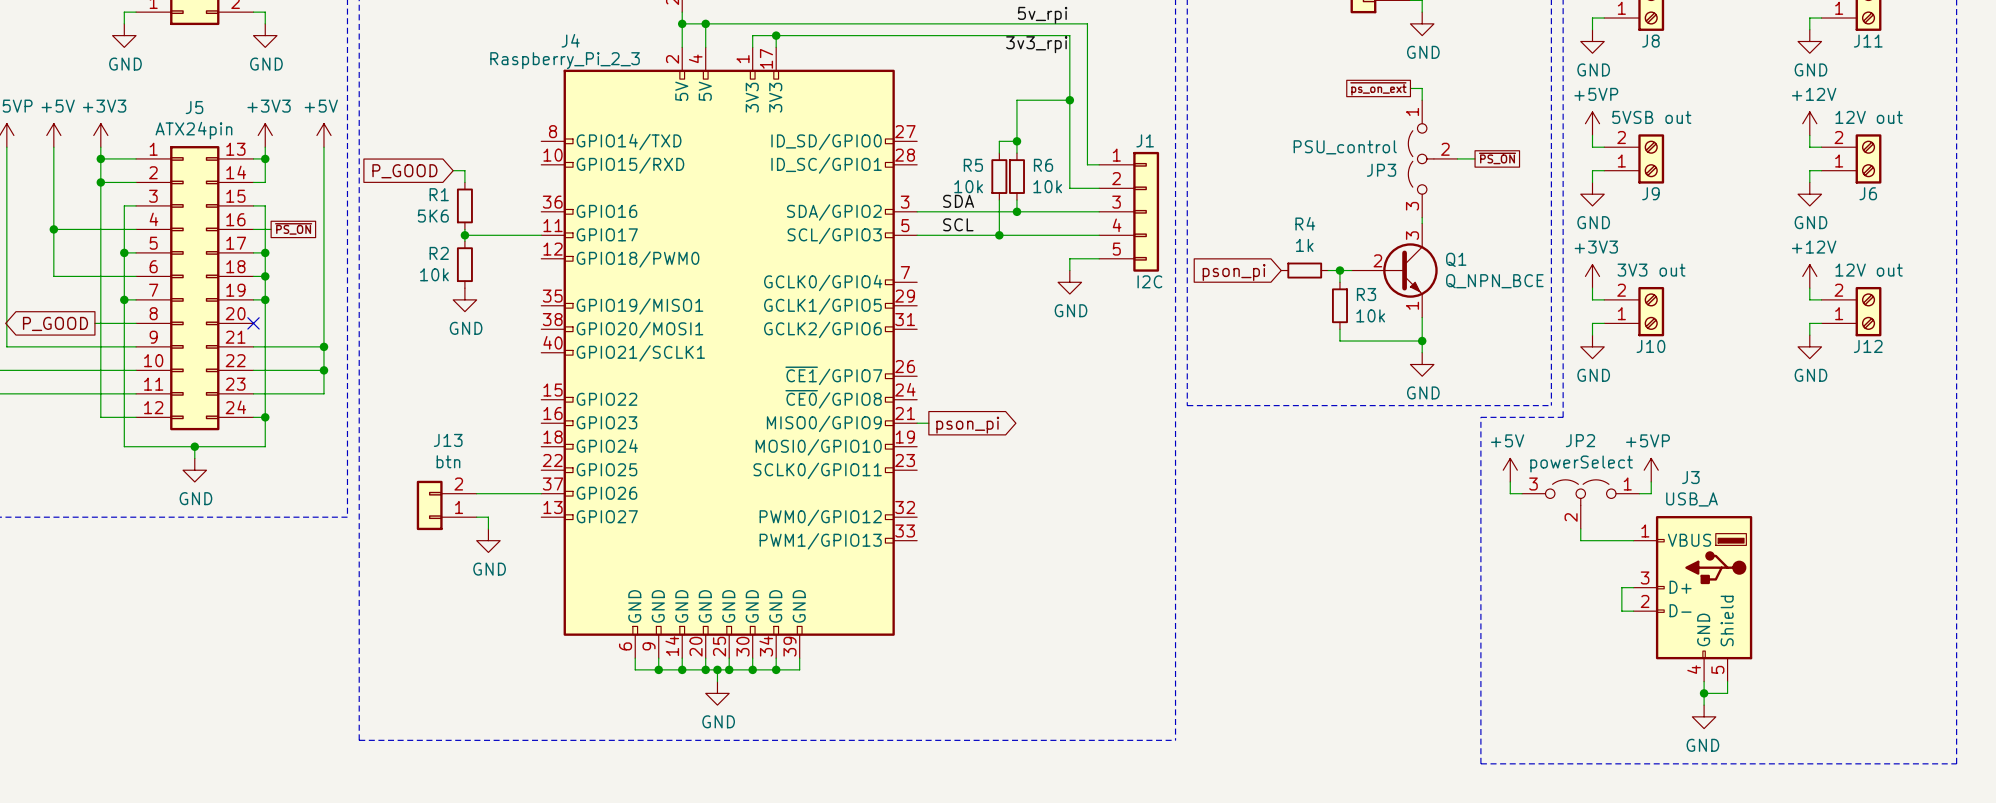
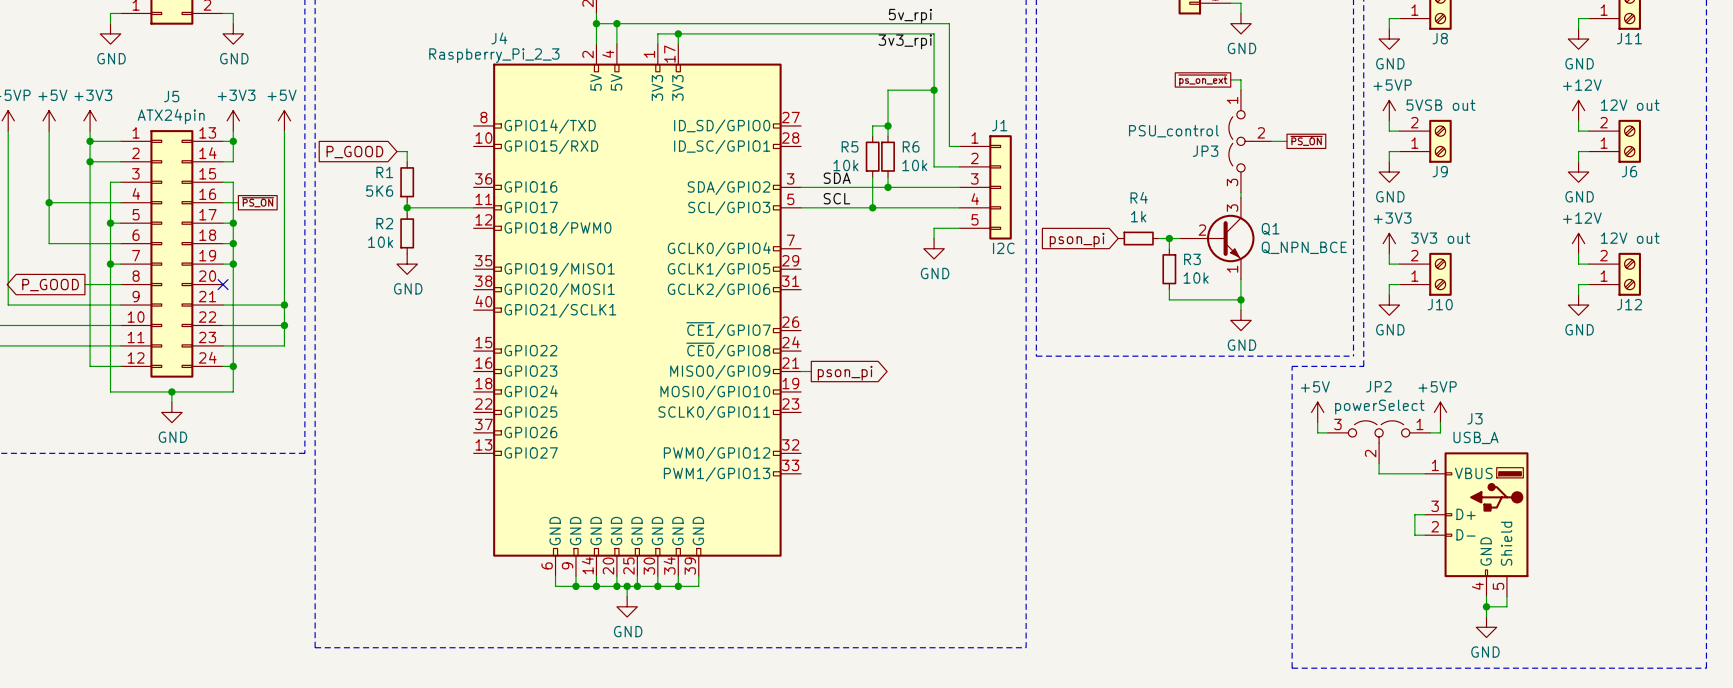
wire: (476, 493) (541, 493) -> none
J13: btn (446, 505) -> none
wire: (476, 517) (488, 517) (488, 528) -> none
power symbol: GND (488, 540) -> none

